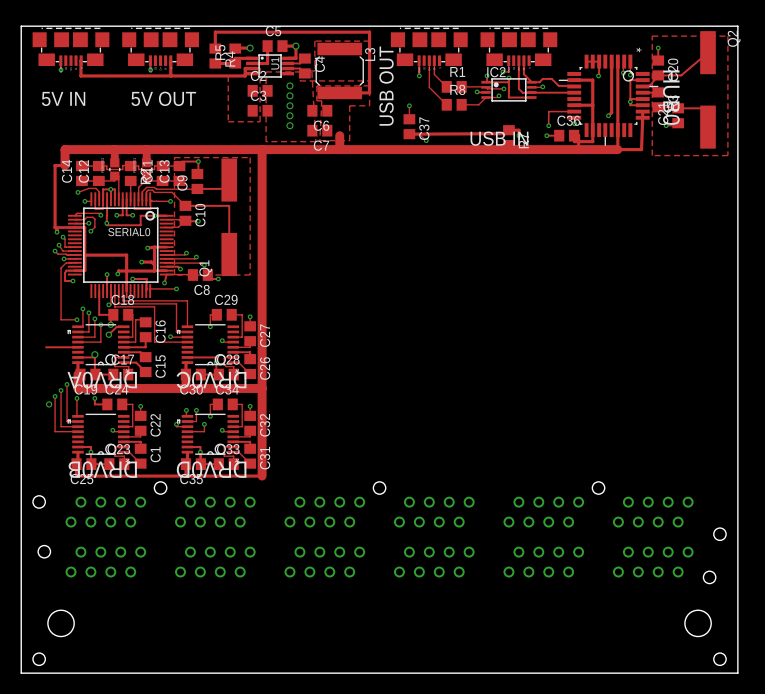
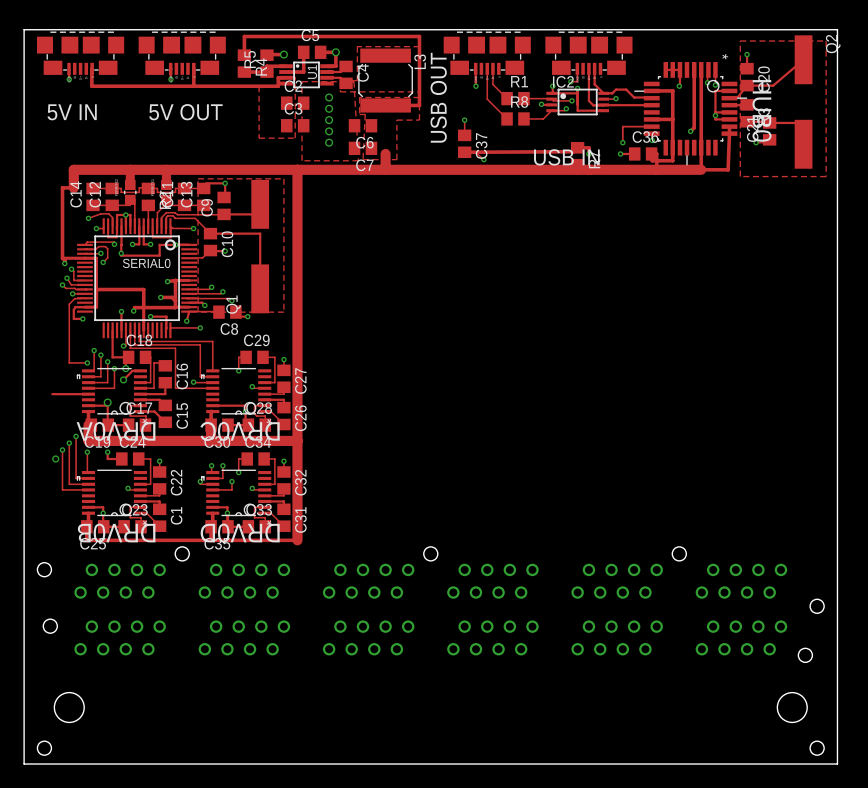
track: (166, 219) (178, 219) (182, 223) -> none

